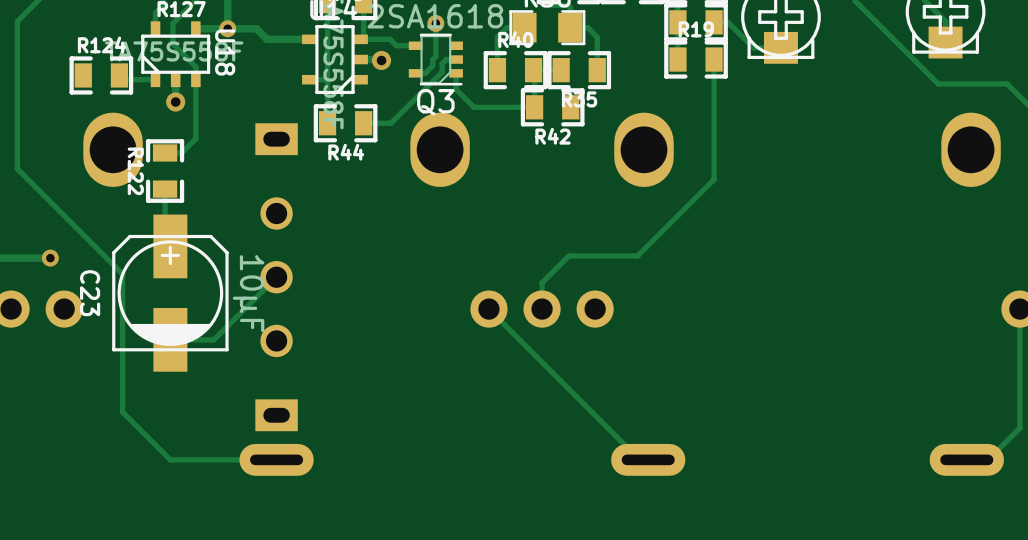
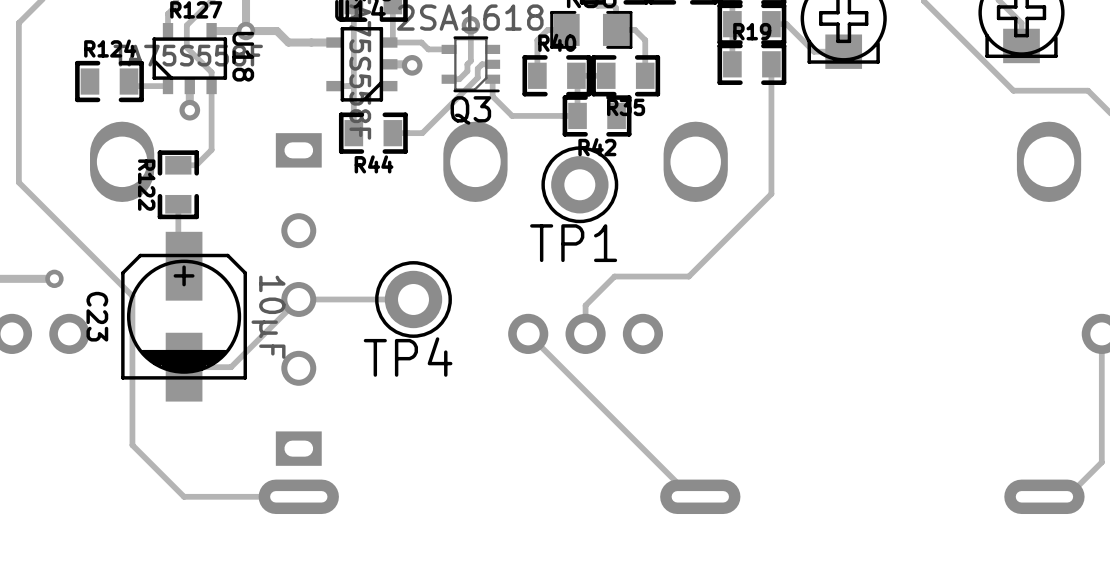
TP1: none -> (579, 184)
track: none -> (413, 299) (298, 299)
TP4: none -> (413, 299)

